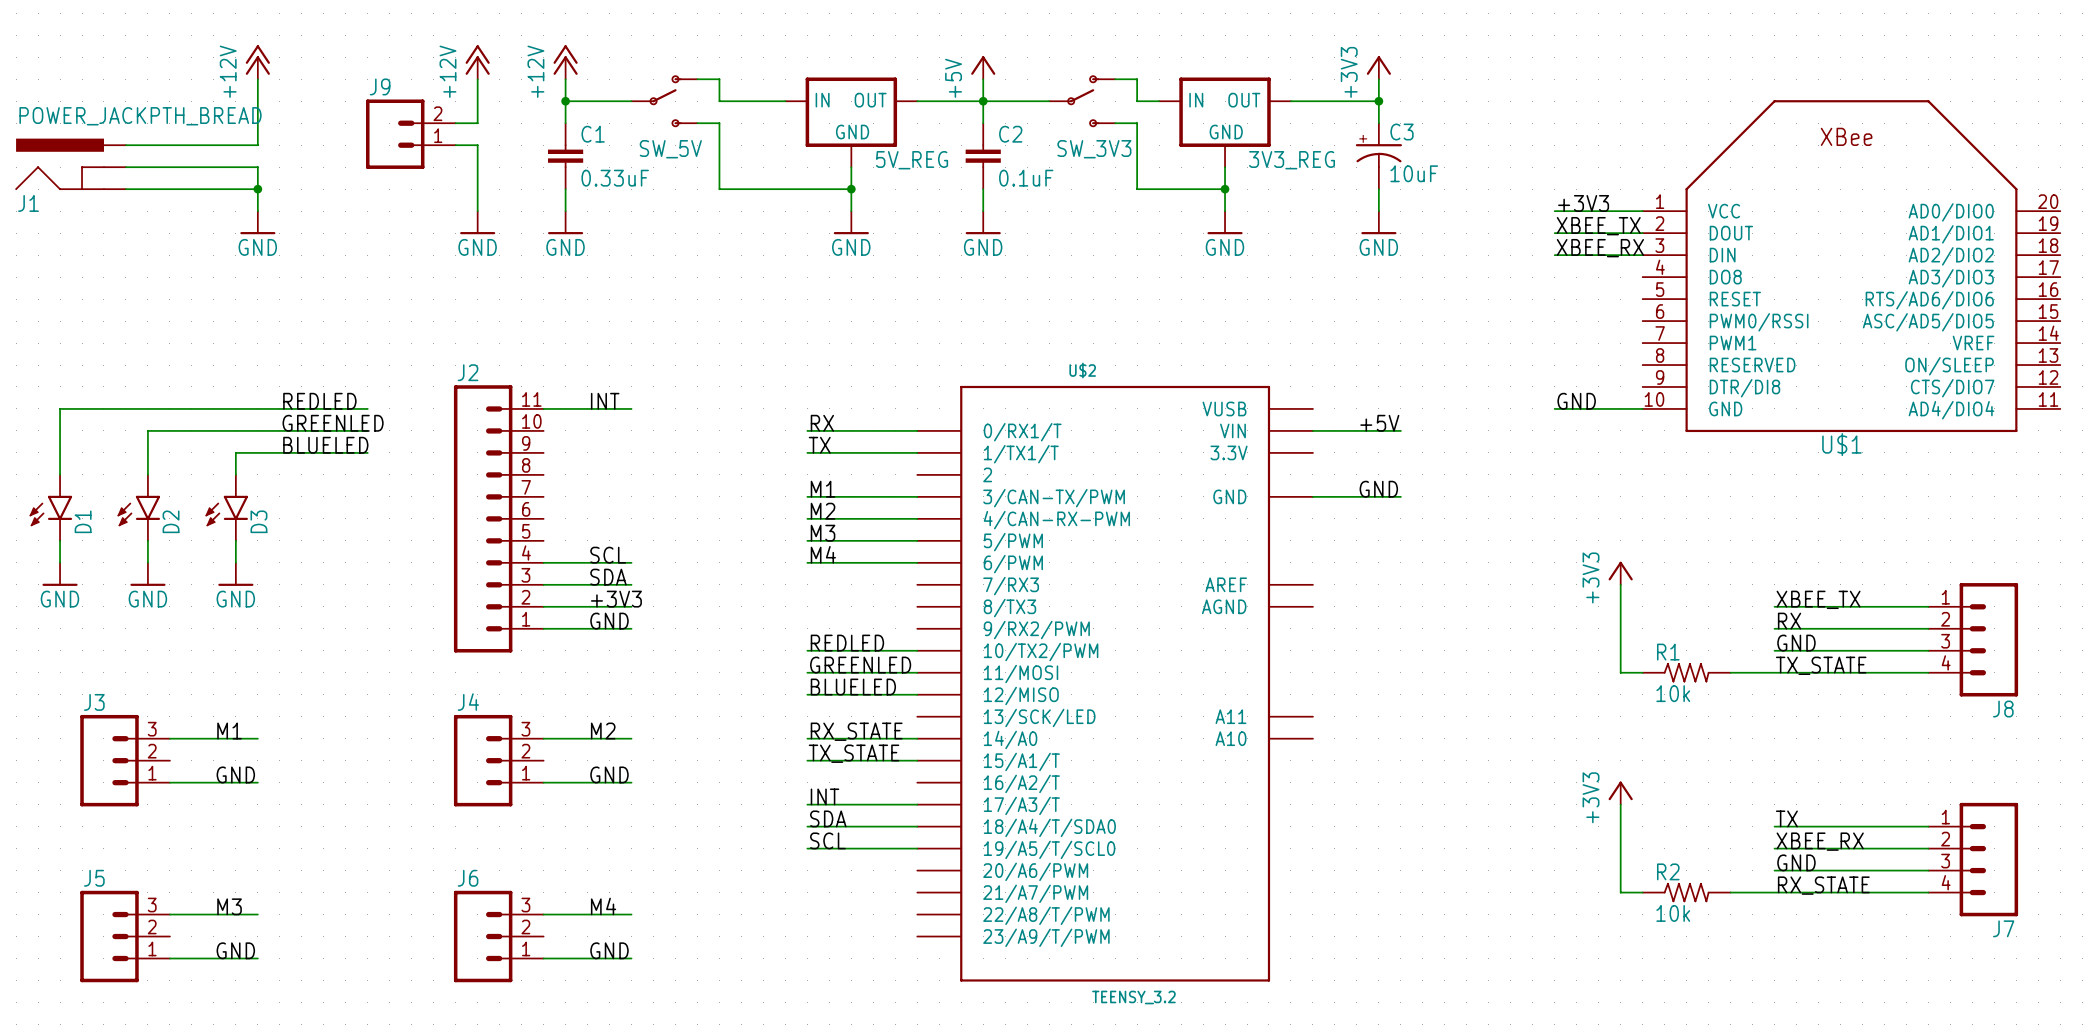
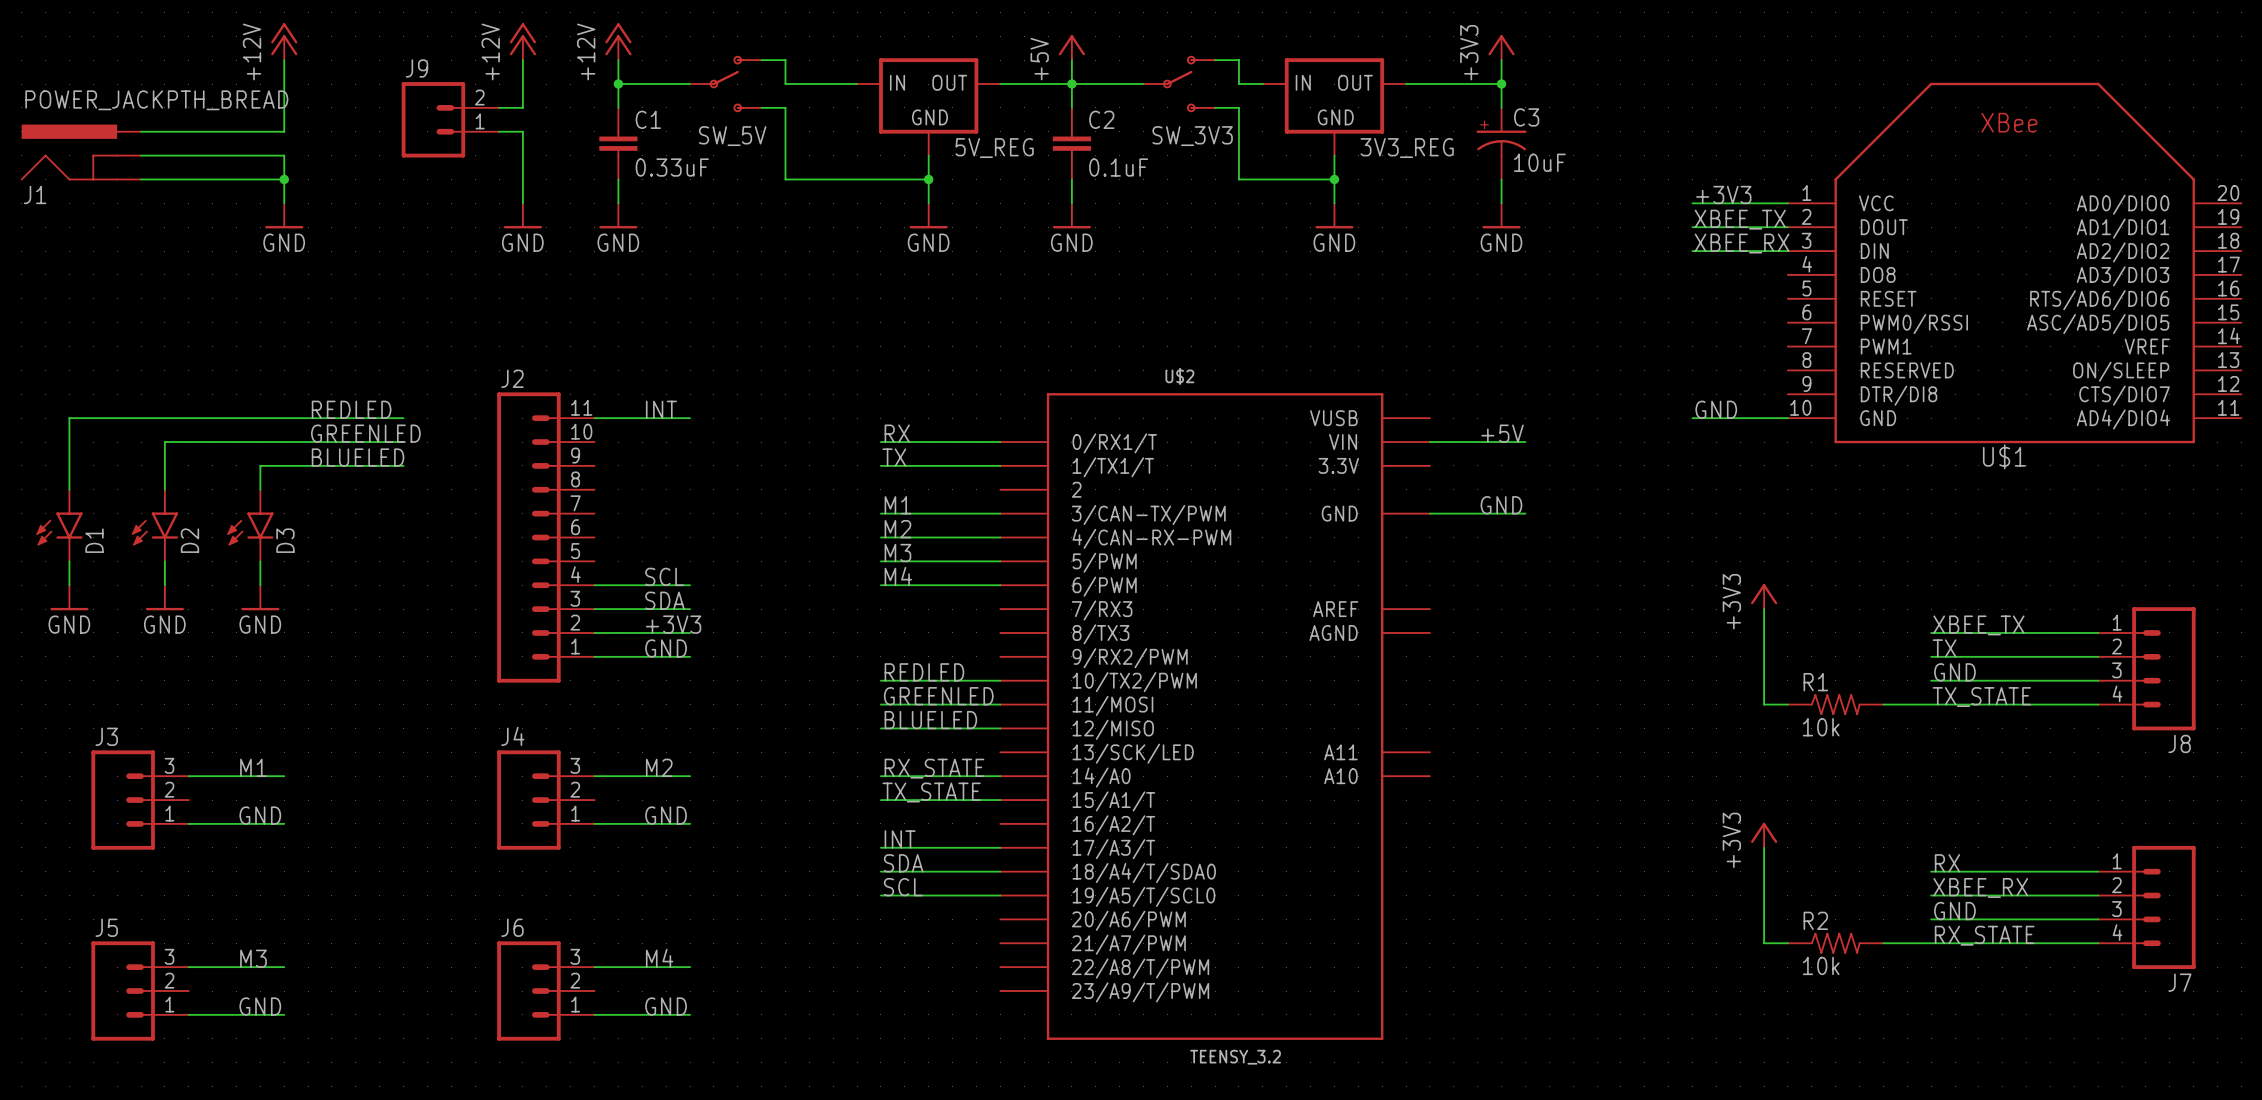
label: RX (1789, 621) -> TX (1944, 648)
label: TX (1786, 818) -> RX (1947, 863)

